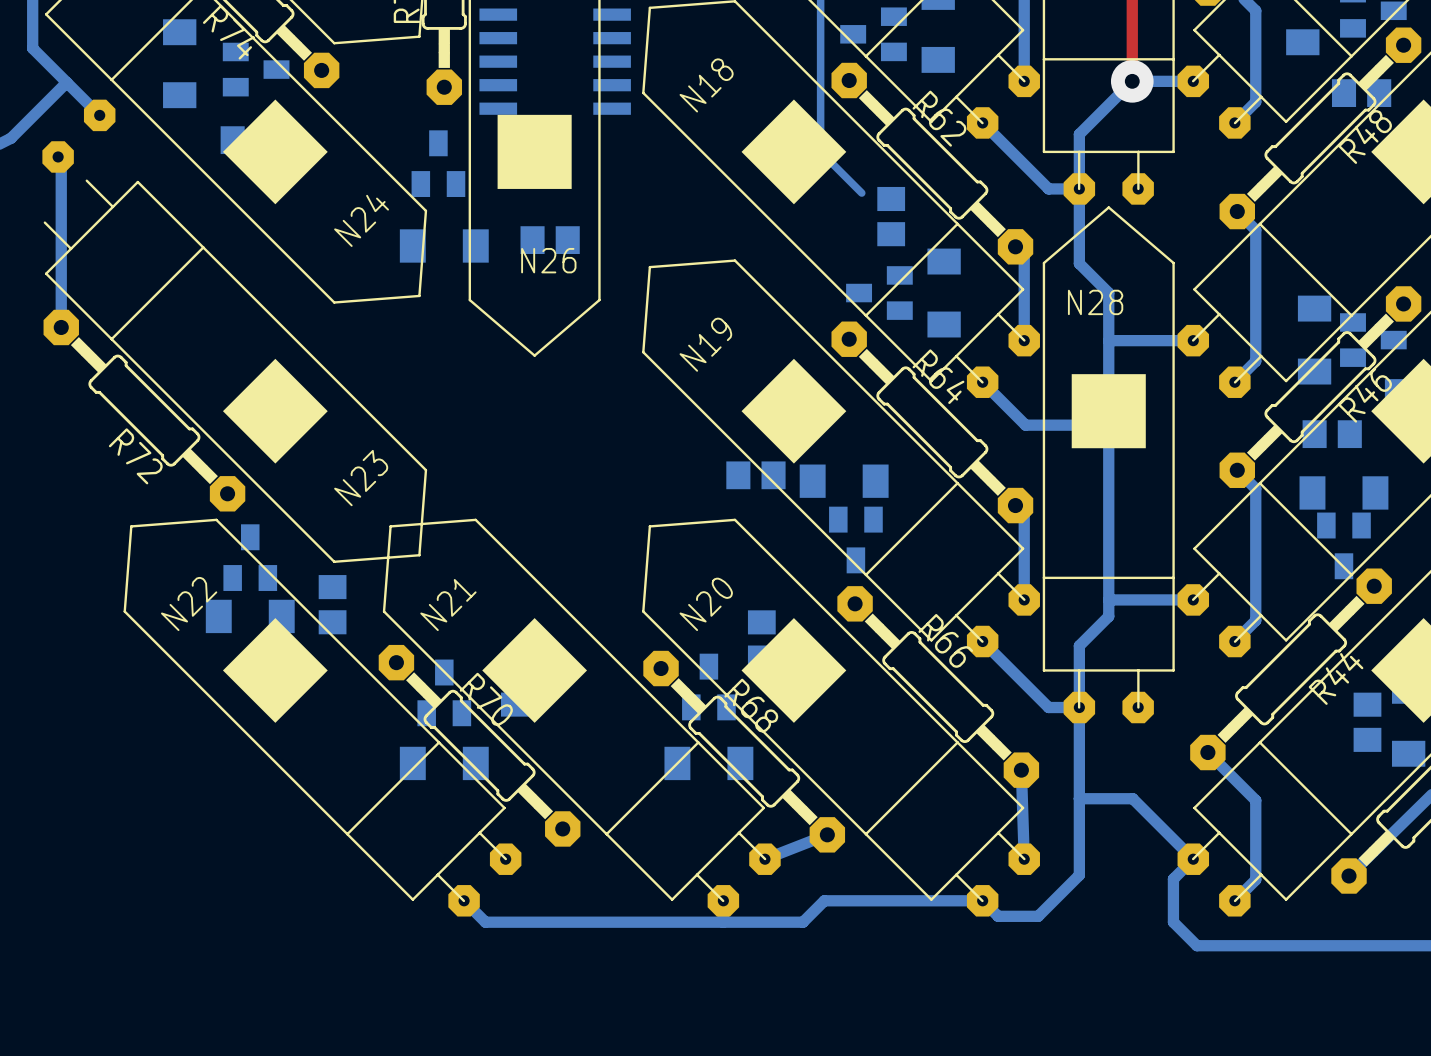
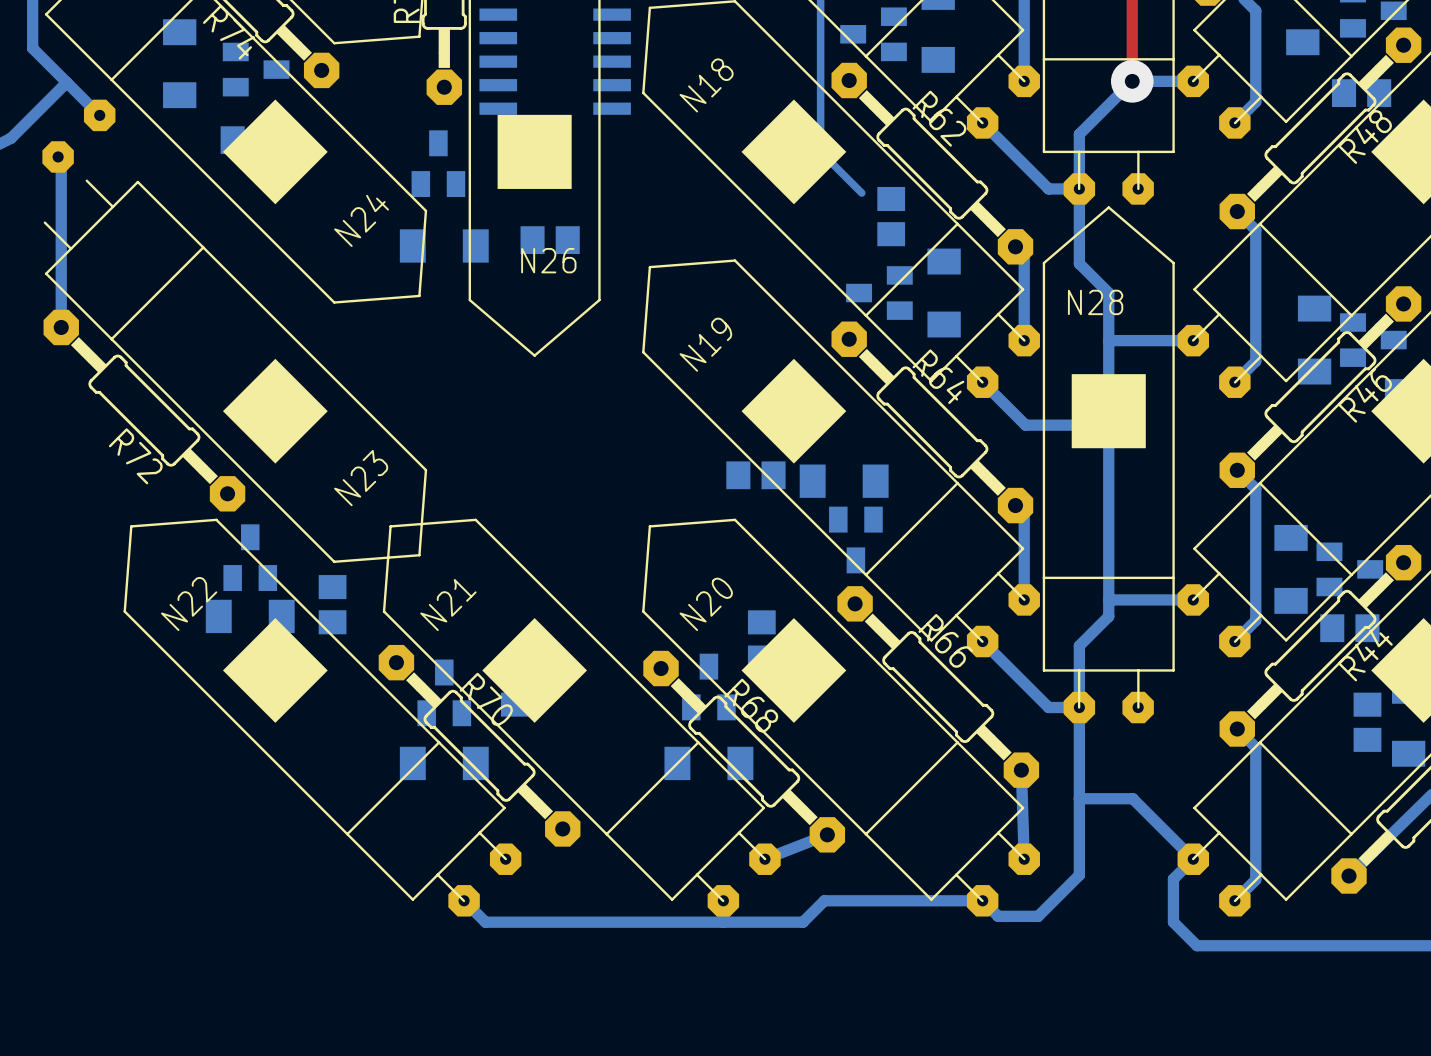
part position: (1332, 434) -> (1349, 628)
part rotation: 0° (1343, 492) -> 90° clockwise (1291, 569)
part position: (1343, 492) -> (1291, 569)
part rotation: 0° (1343, 545) -> 90° counterclockwise (1349, 569)
R44 position: (1291, 669) -> (1320, 645)
bottom track: (1207, 752) (1255, 800) -> (1237, 729) (1255, 747) (1255, 800)

